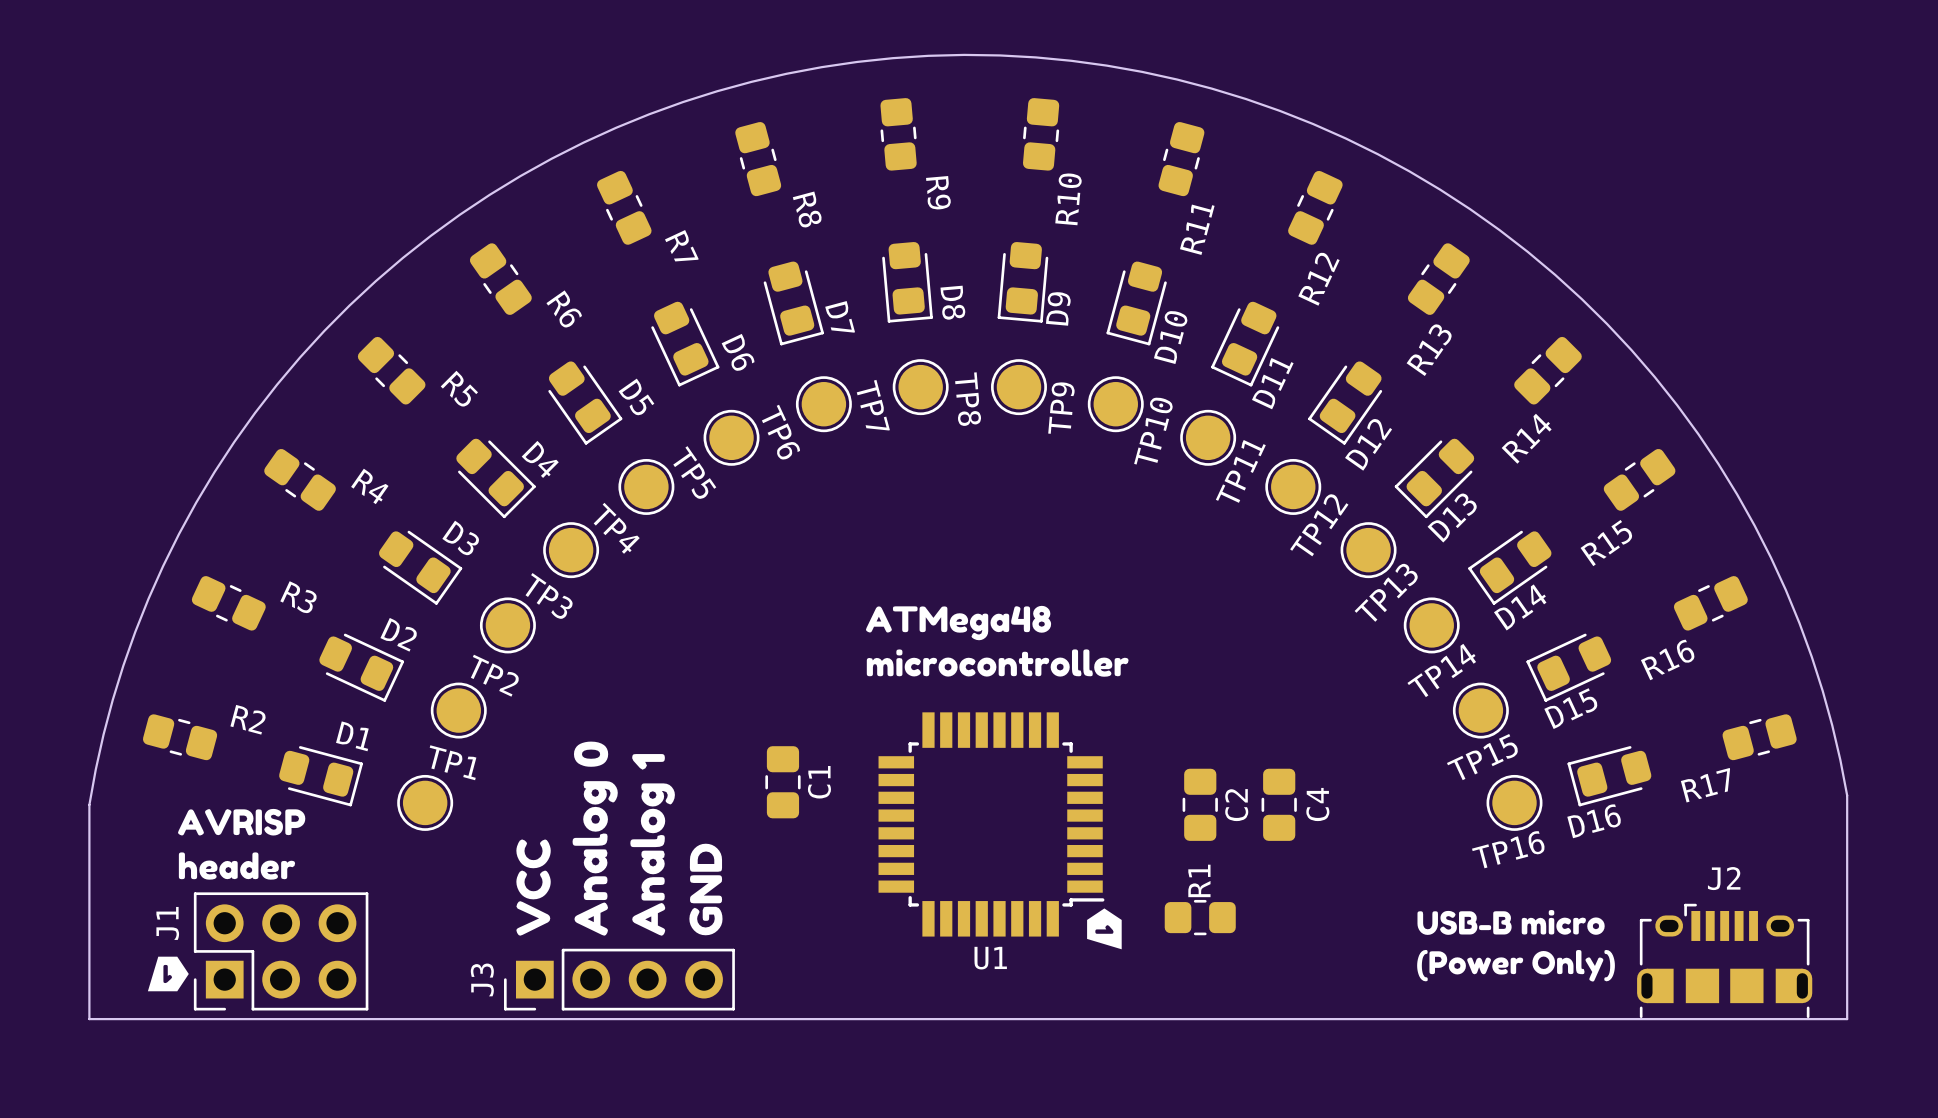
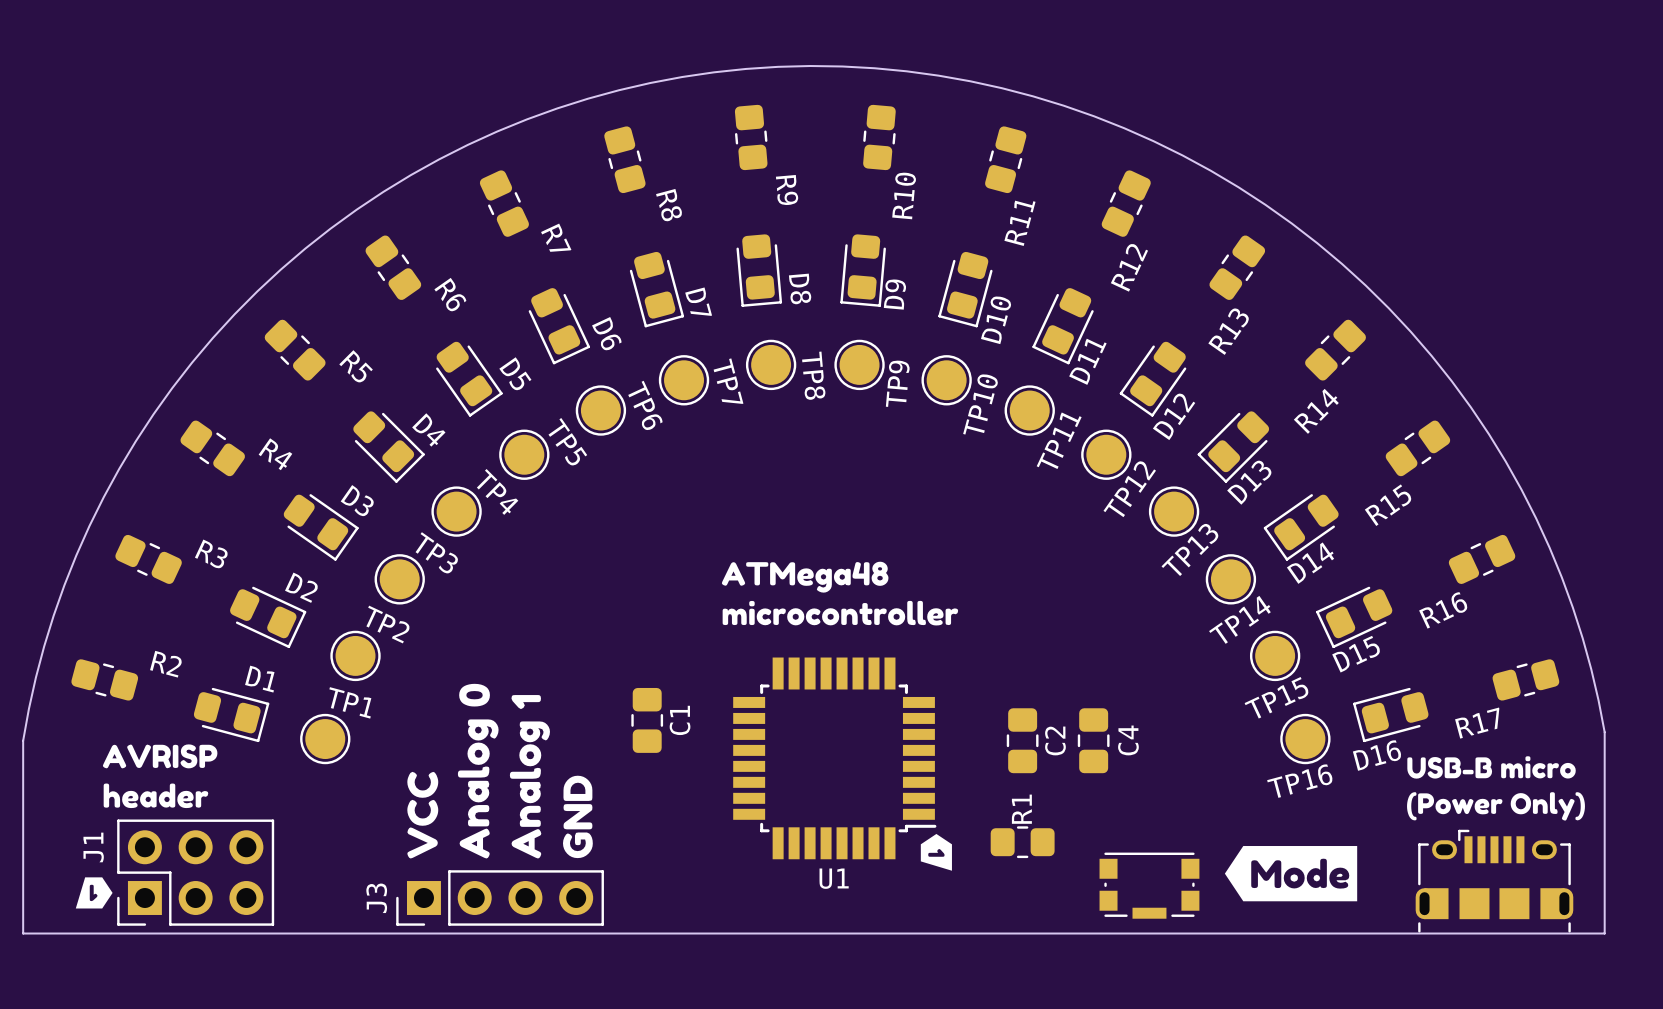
J2 name: J2 (1724, 878) -> none
drawing: none -> [1224, 846, 1358, 902]
drawing position: (1516, 945) -> (1495, 788)
part: none -> (1149, 885)

